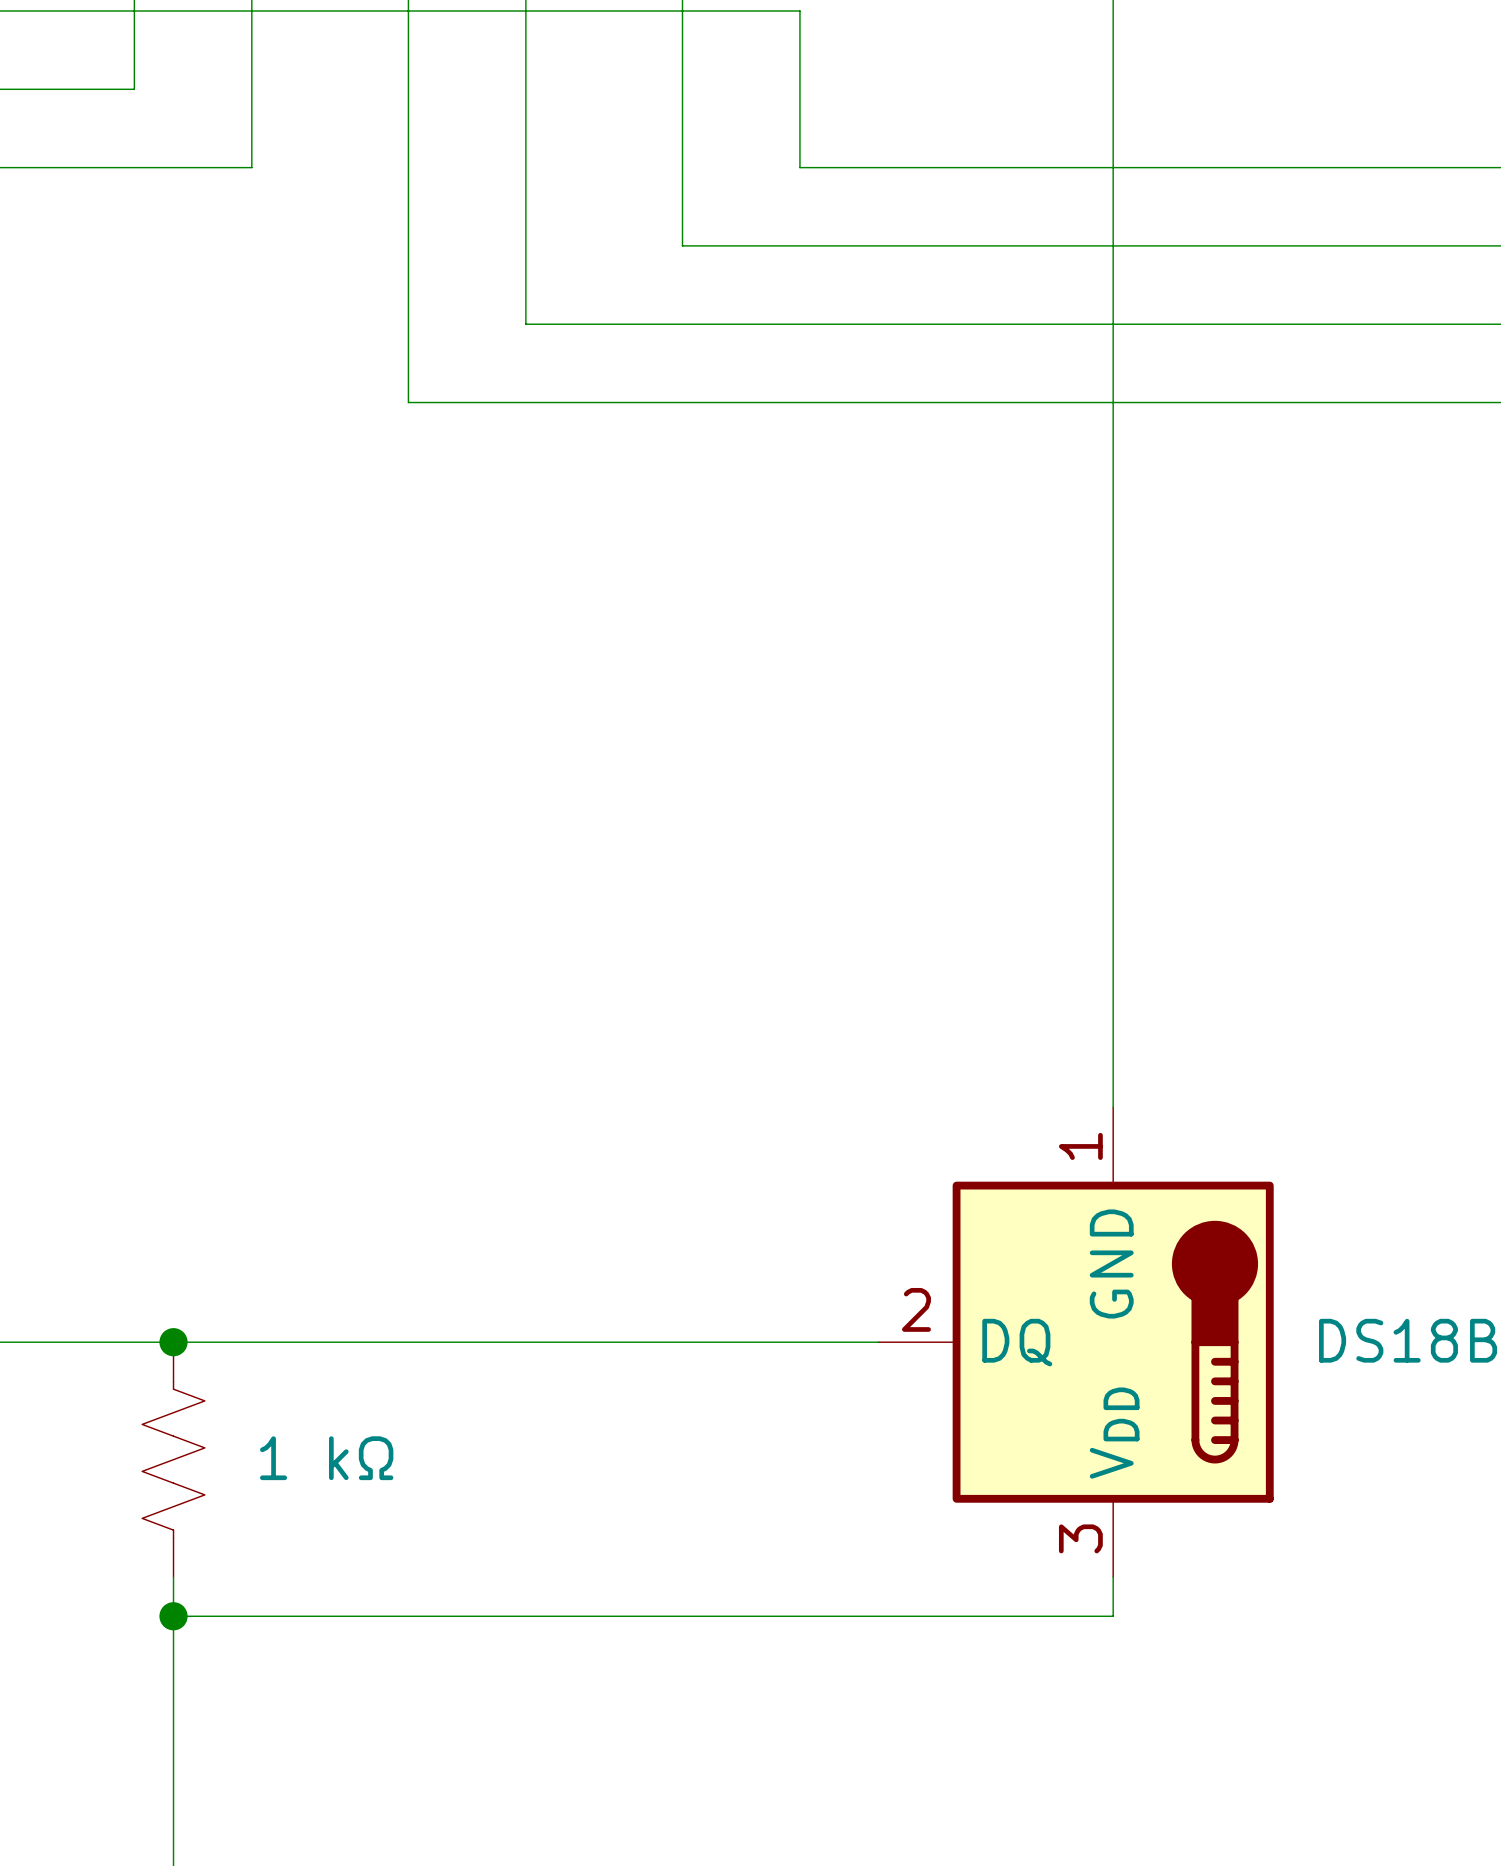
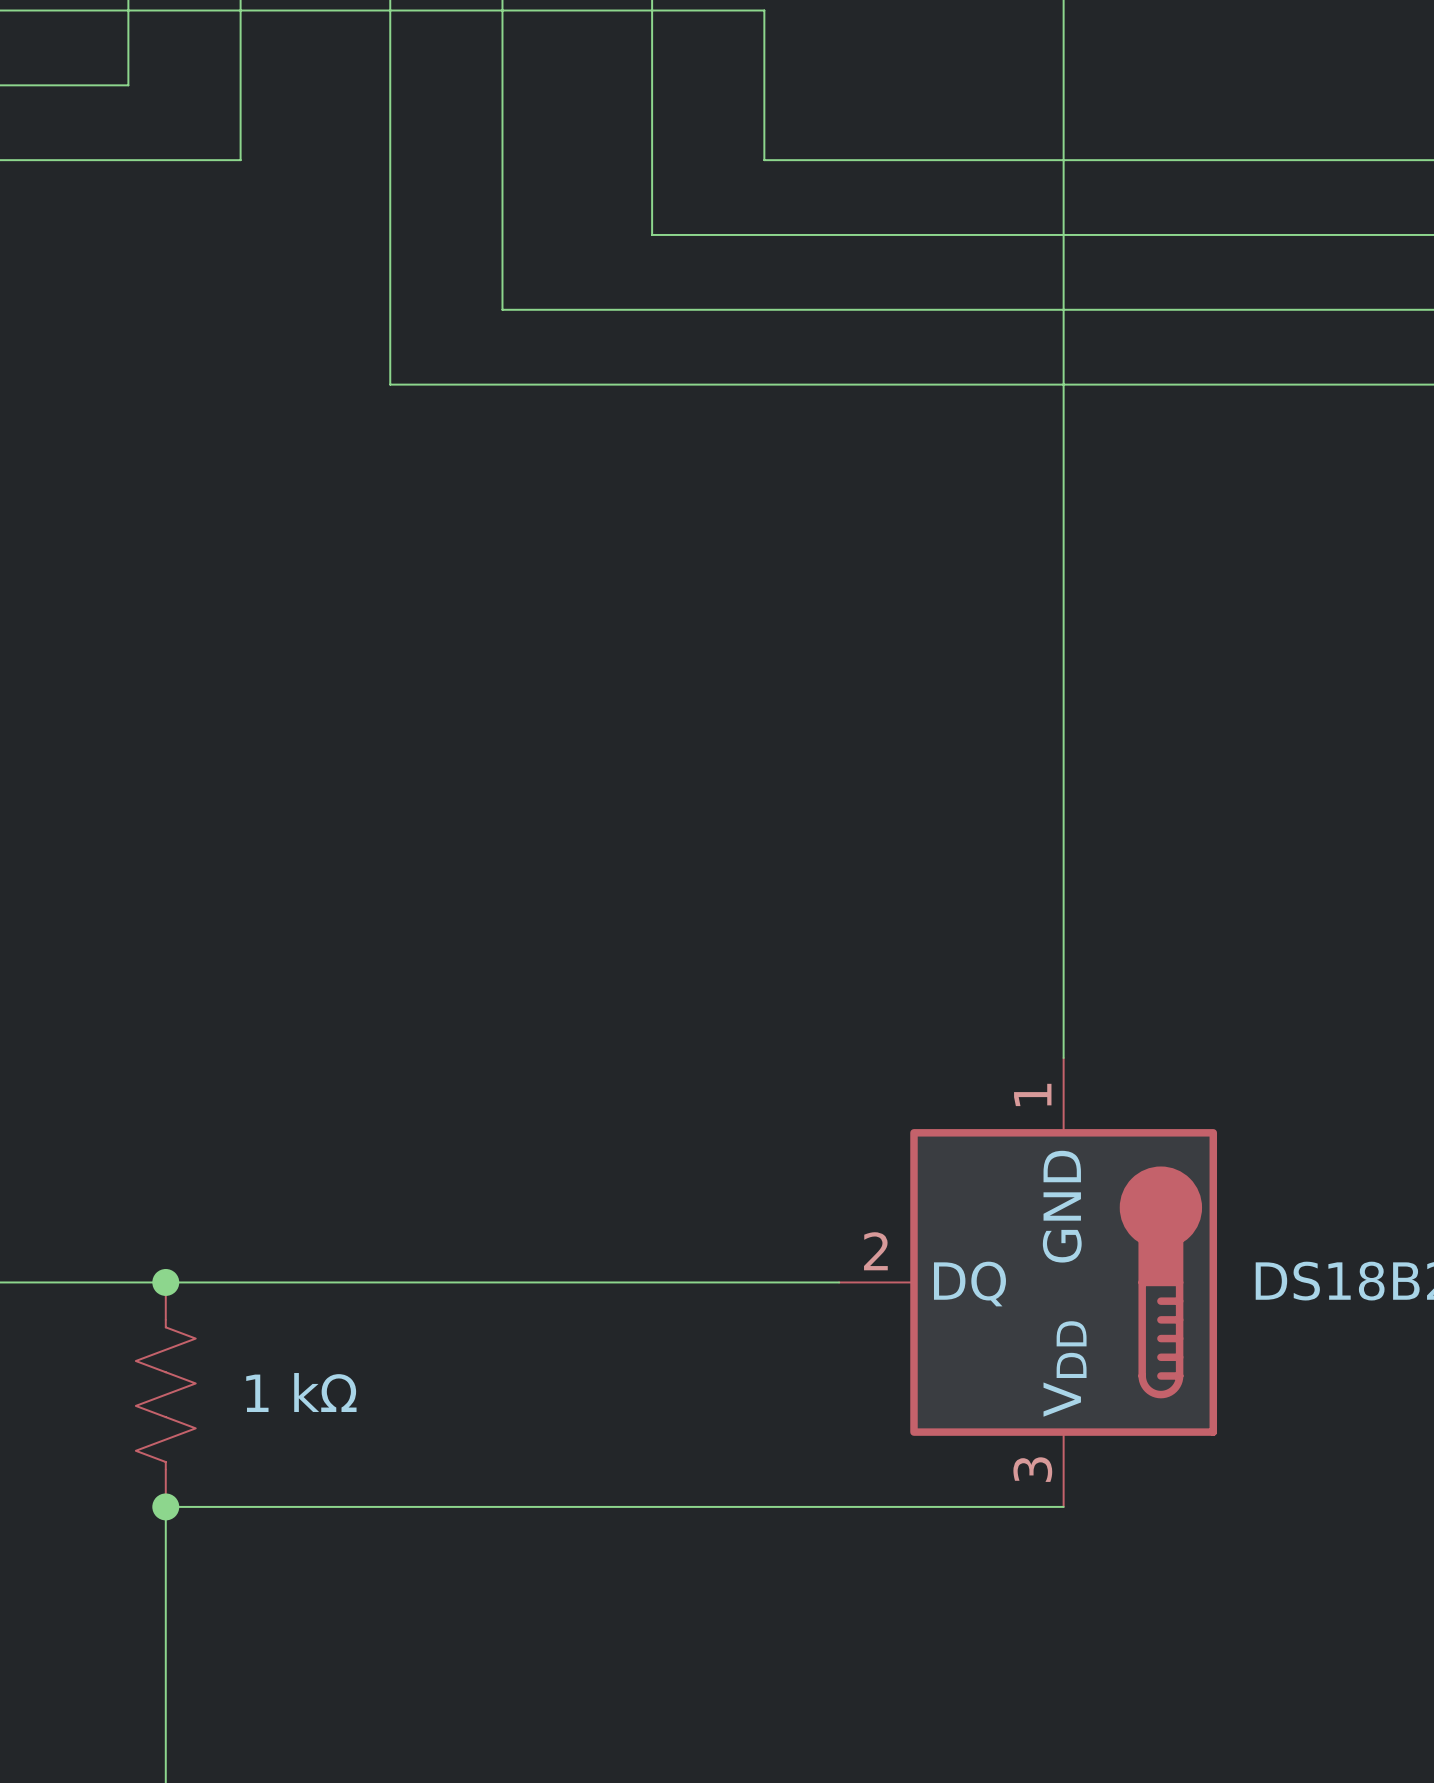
wire: (1113, 1577) (1113, 1616) (173, 1616) -> (1063, 1506) (165, 1506)
junction position: (173, 1616) -> (165, 1506)

